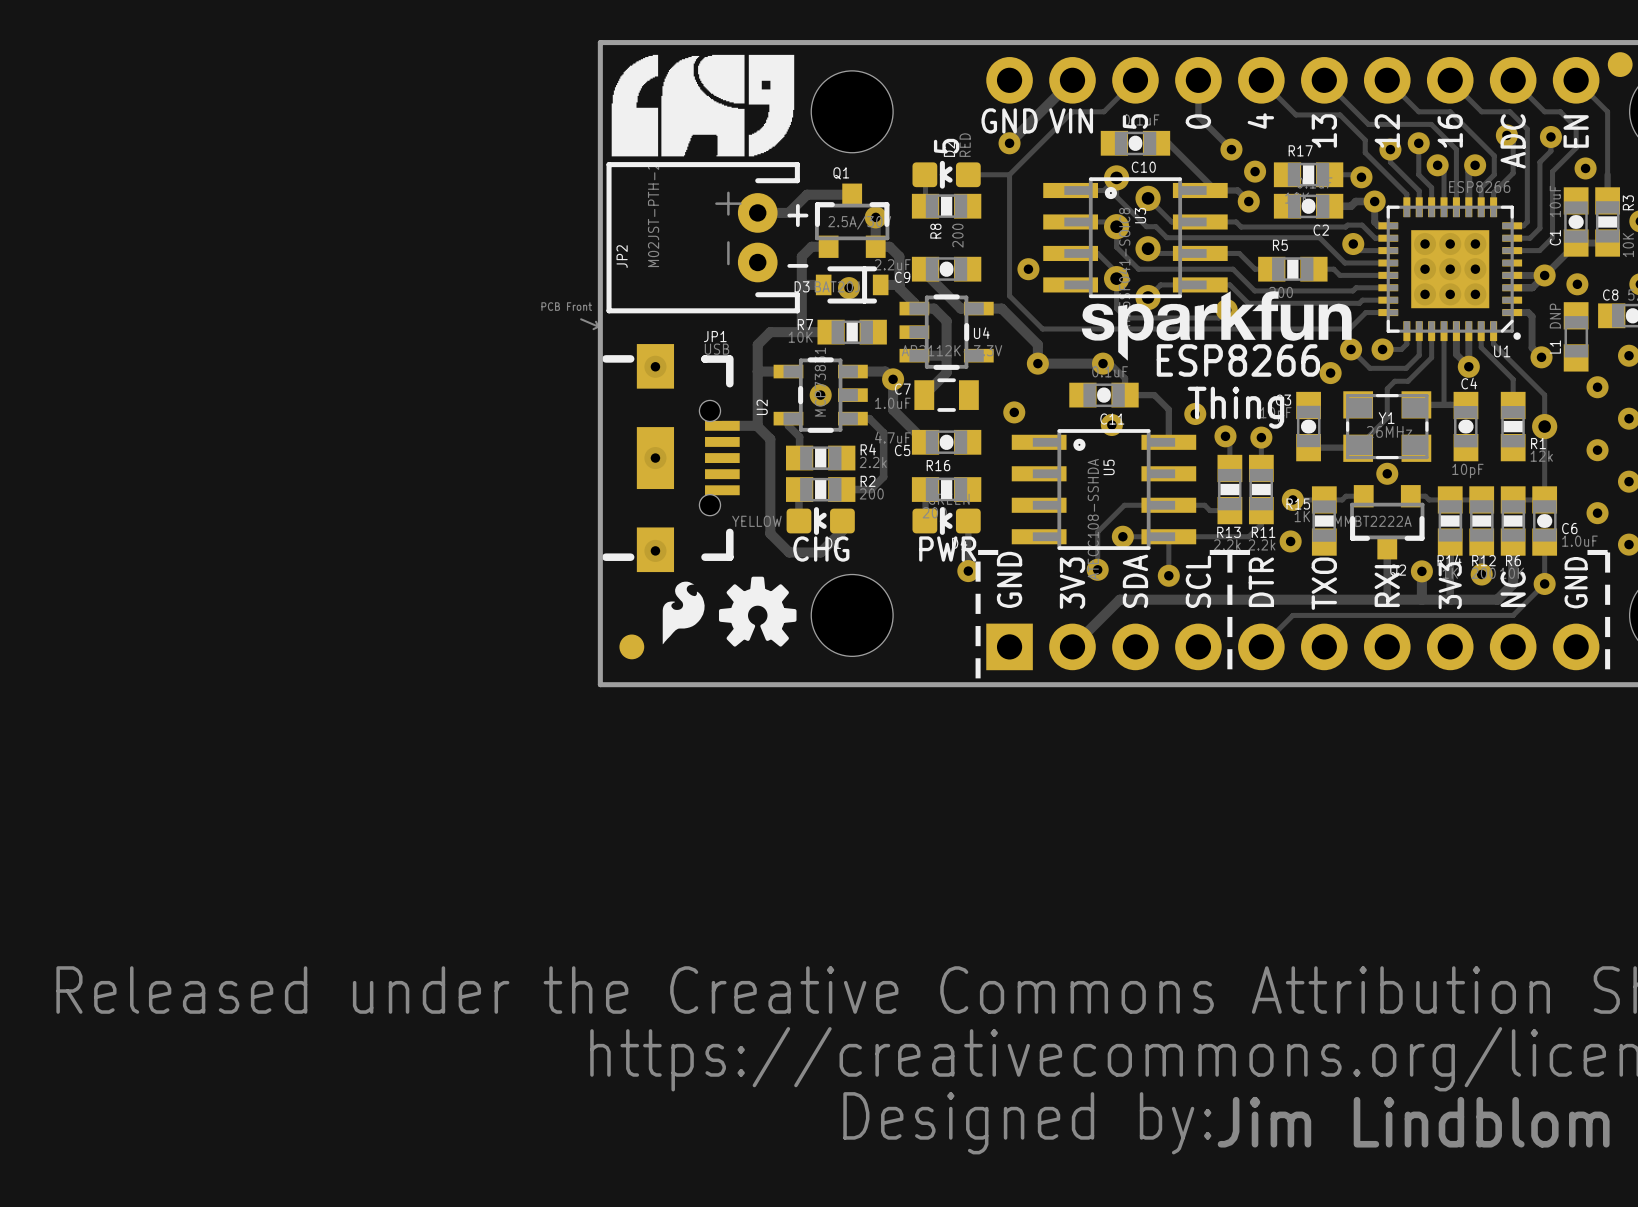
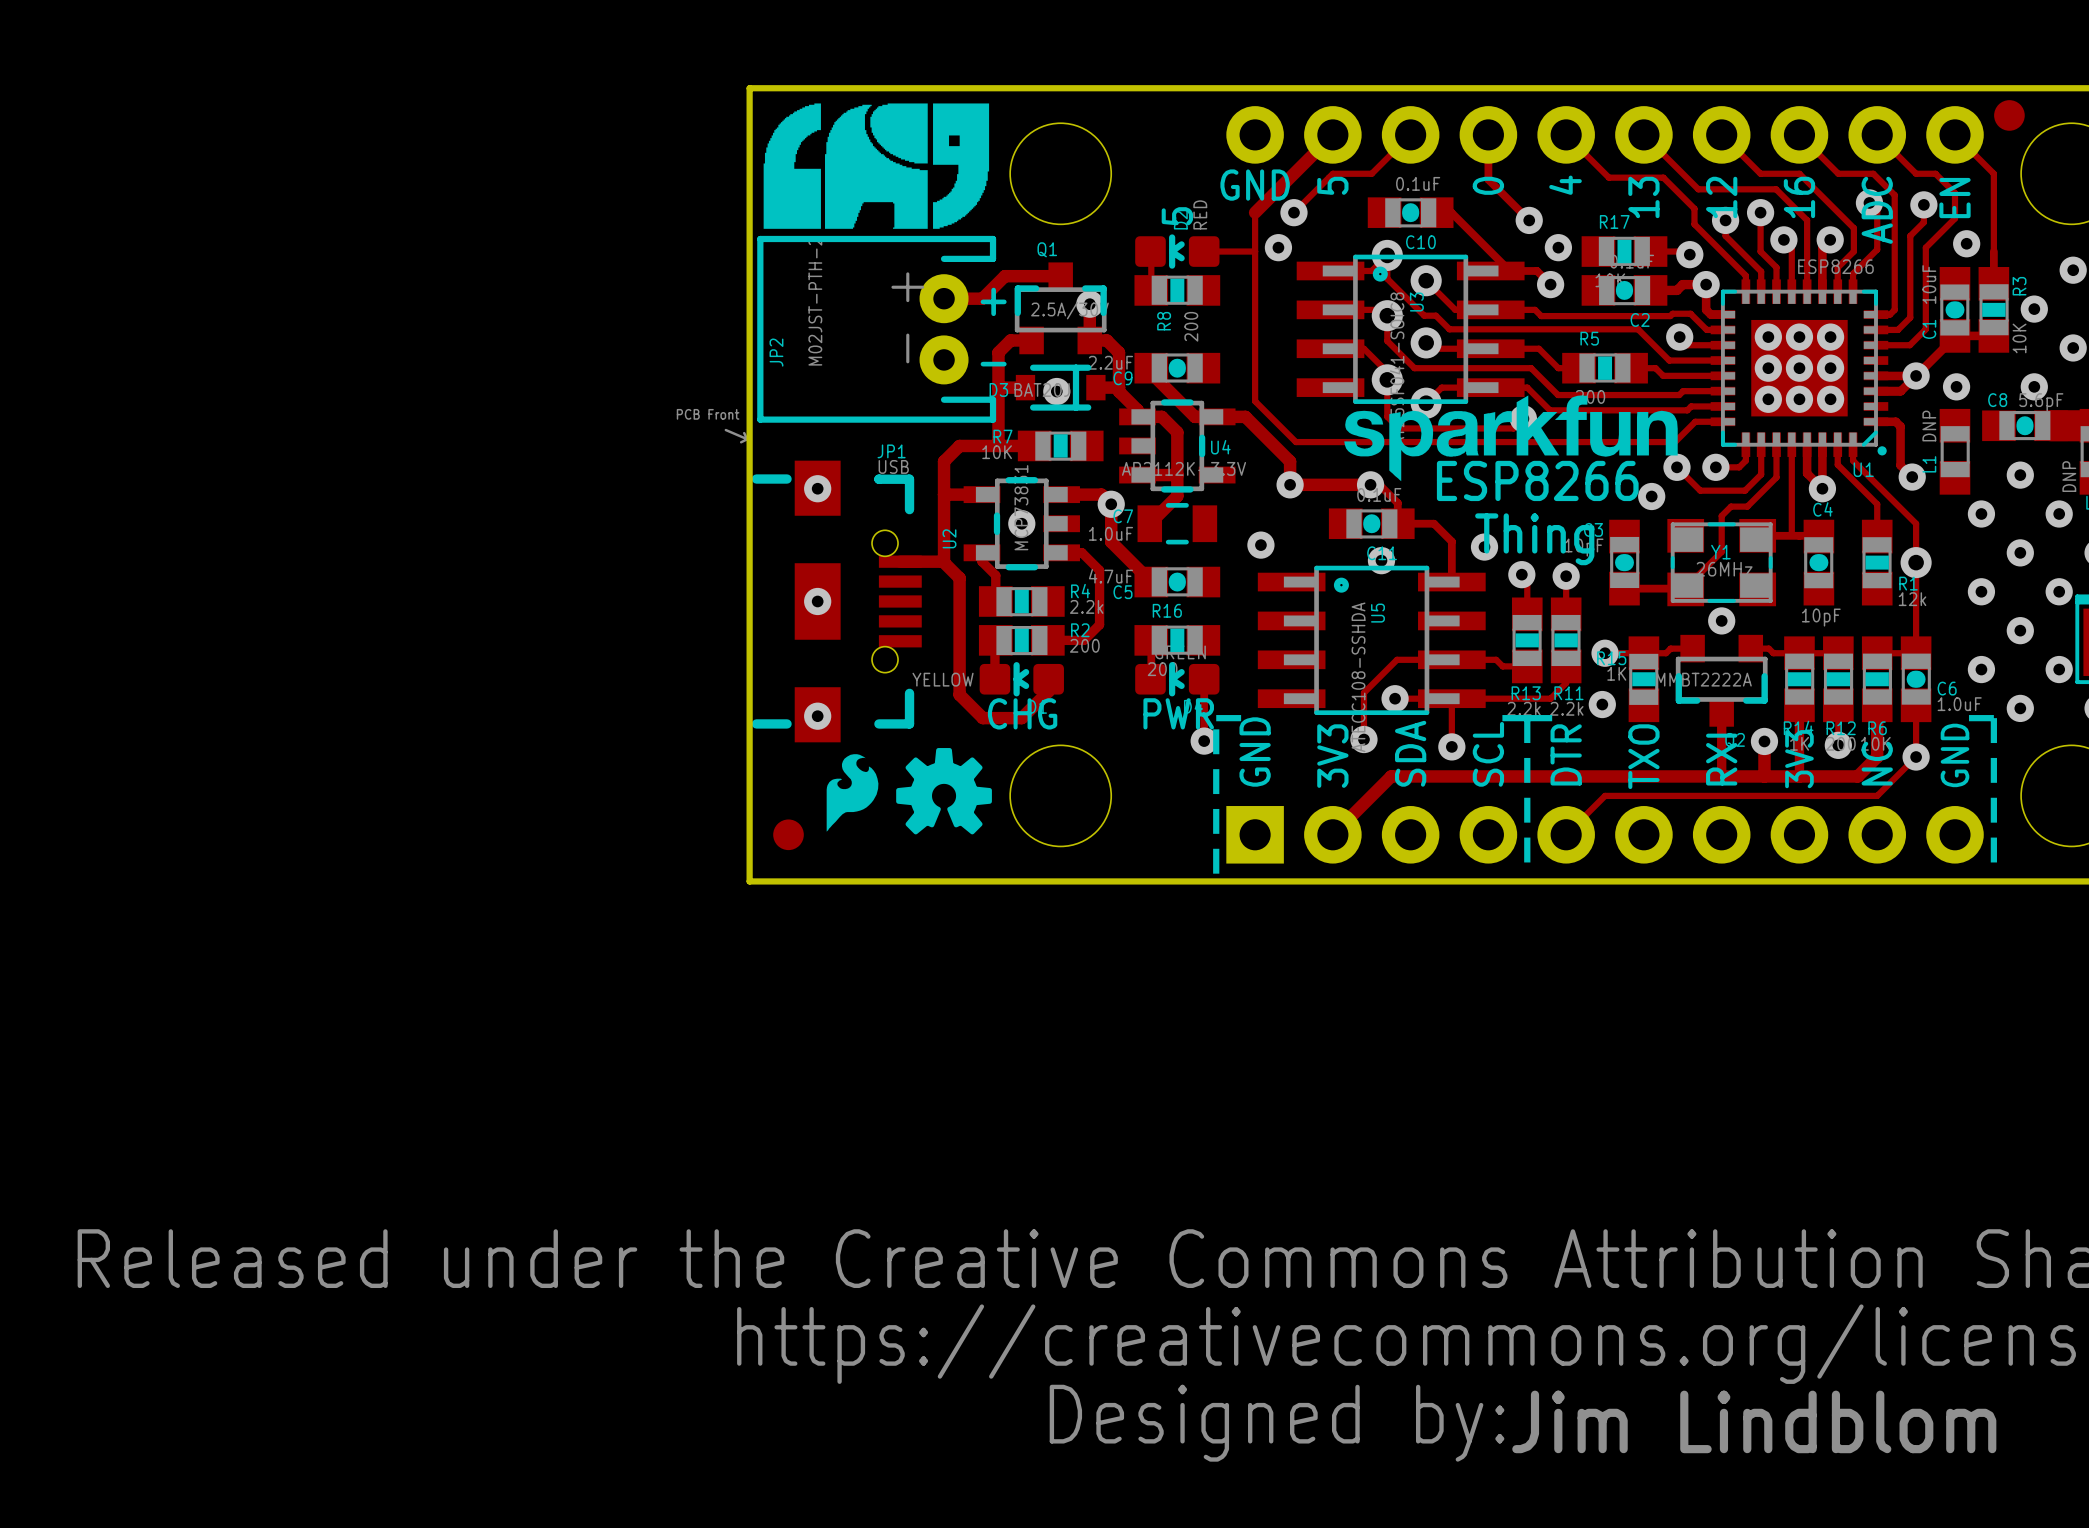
text: VIN (1071, 120) -> 5 (1332, 185)
text: 5 (1135, 121) -> none
via: (1009, 143) -> none
track: (1041, 143) (1009, 174) -> (1255, 212) (1255, 251)
via: none -> (1293, 212)
via: none -> (1278, 247)
via: (1028, 269) -> none

